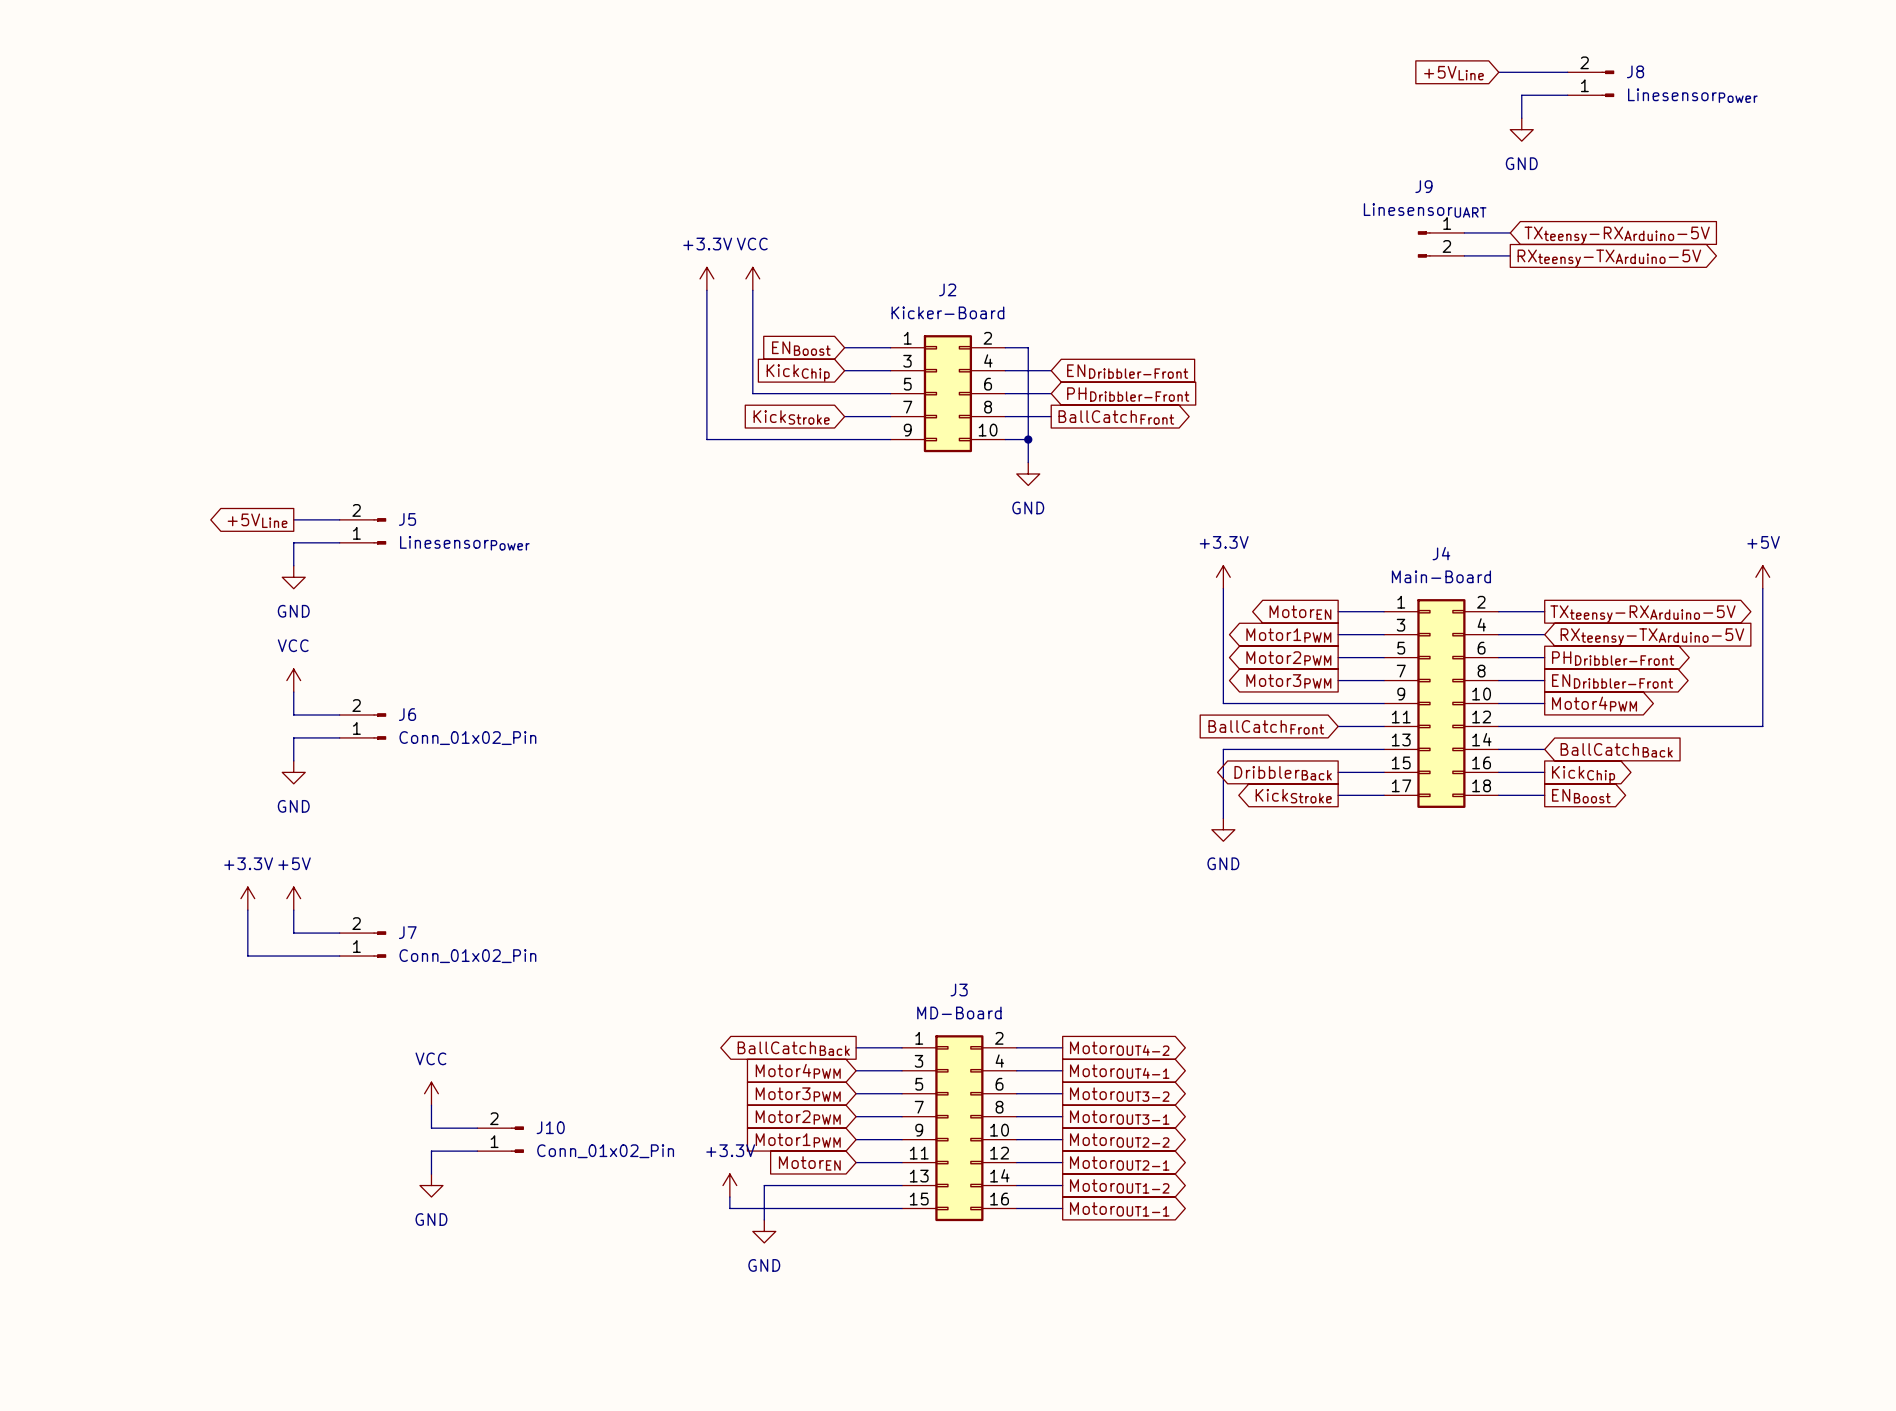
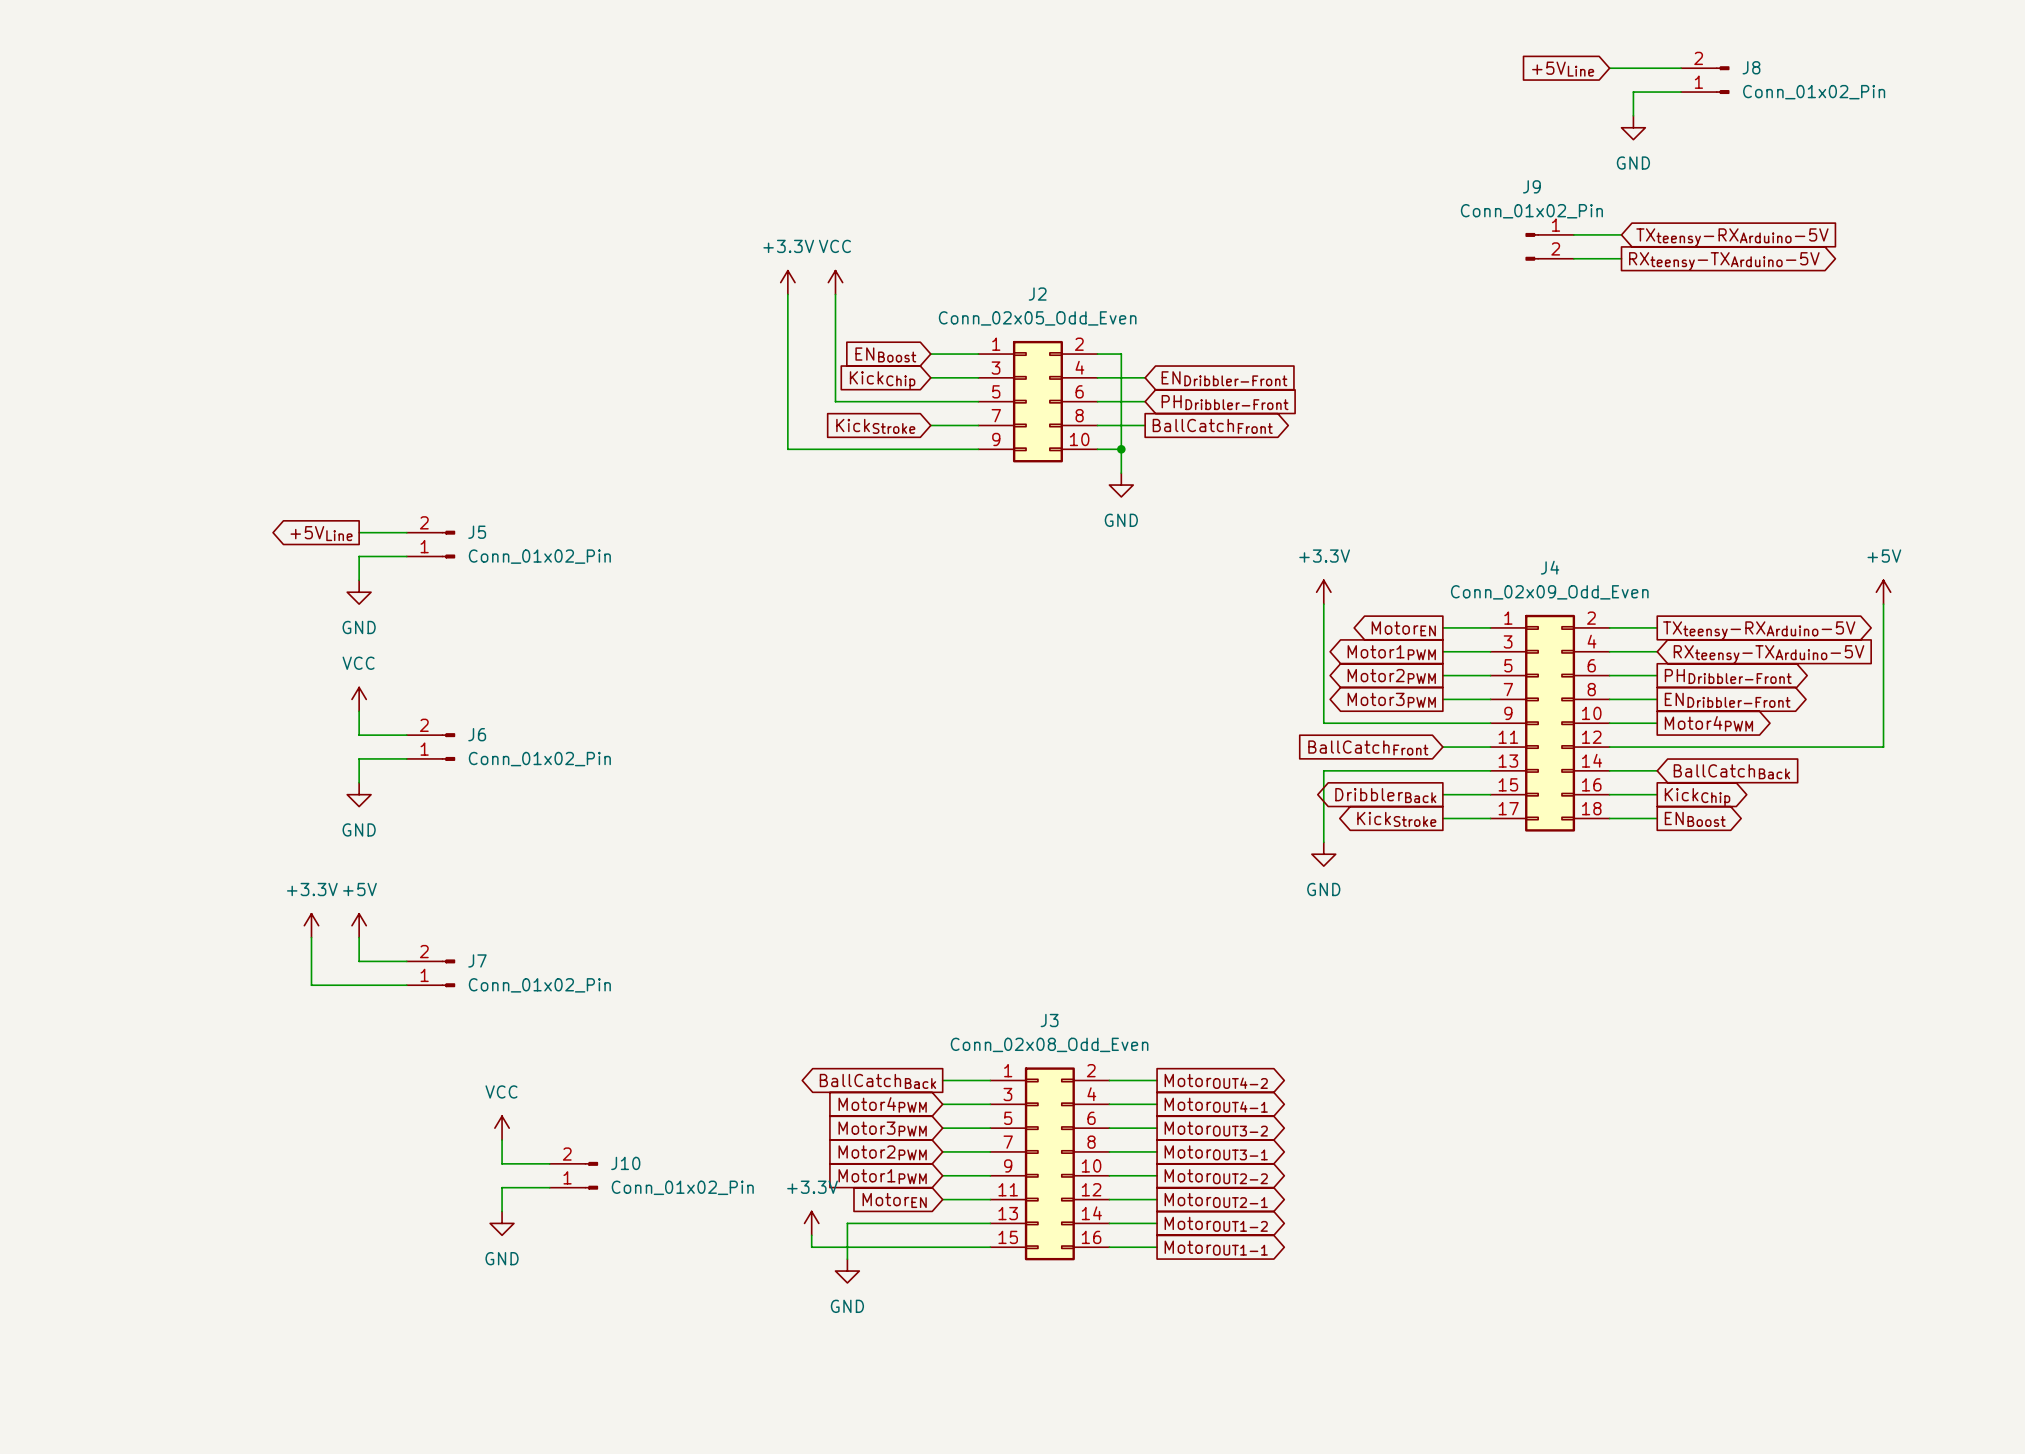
J8 value: LinesensorPower (1692, 95) -> Conn_01x02_Pin (1814, 92)
J9 value: LinesensorUART (1425, 210) -> Conn_01x02_Pin (1531, 211)
J2 value: Kicker-Board (947, 312) -> Conn_02x05_Odd_Even (1037, 318)
J5 value: LinesensorPower (464, 543) -> Conn_01x02_Pin (539, 556)
J4 value: Main-Board (1441, 576) -> Conn_02x09_Odd_Even (1549, 592)
J3 value: MD-Board (959, 1012) -> Conn_02x08_Odd_Even (1049, 1044)

